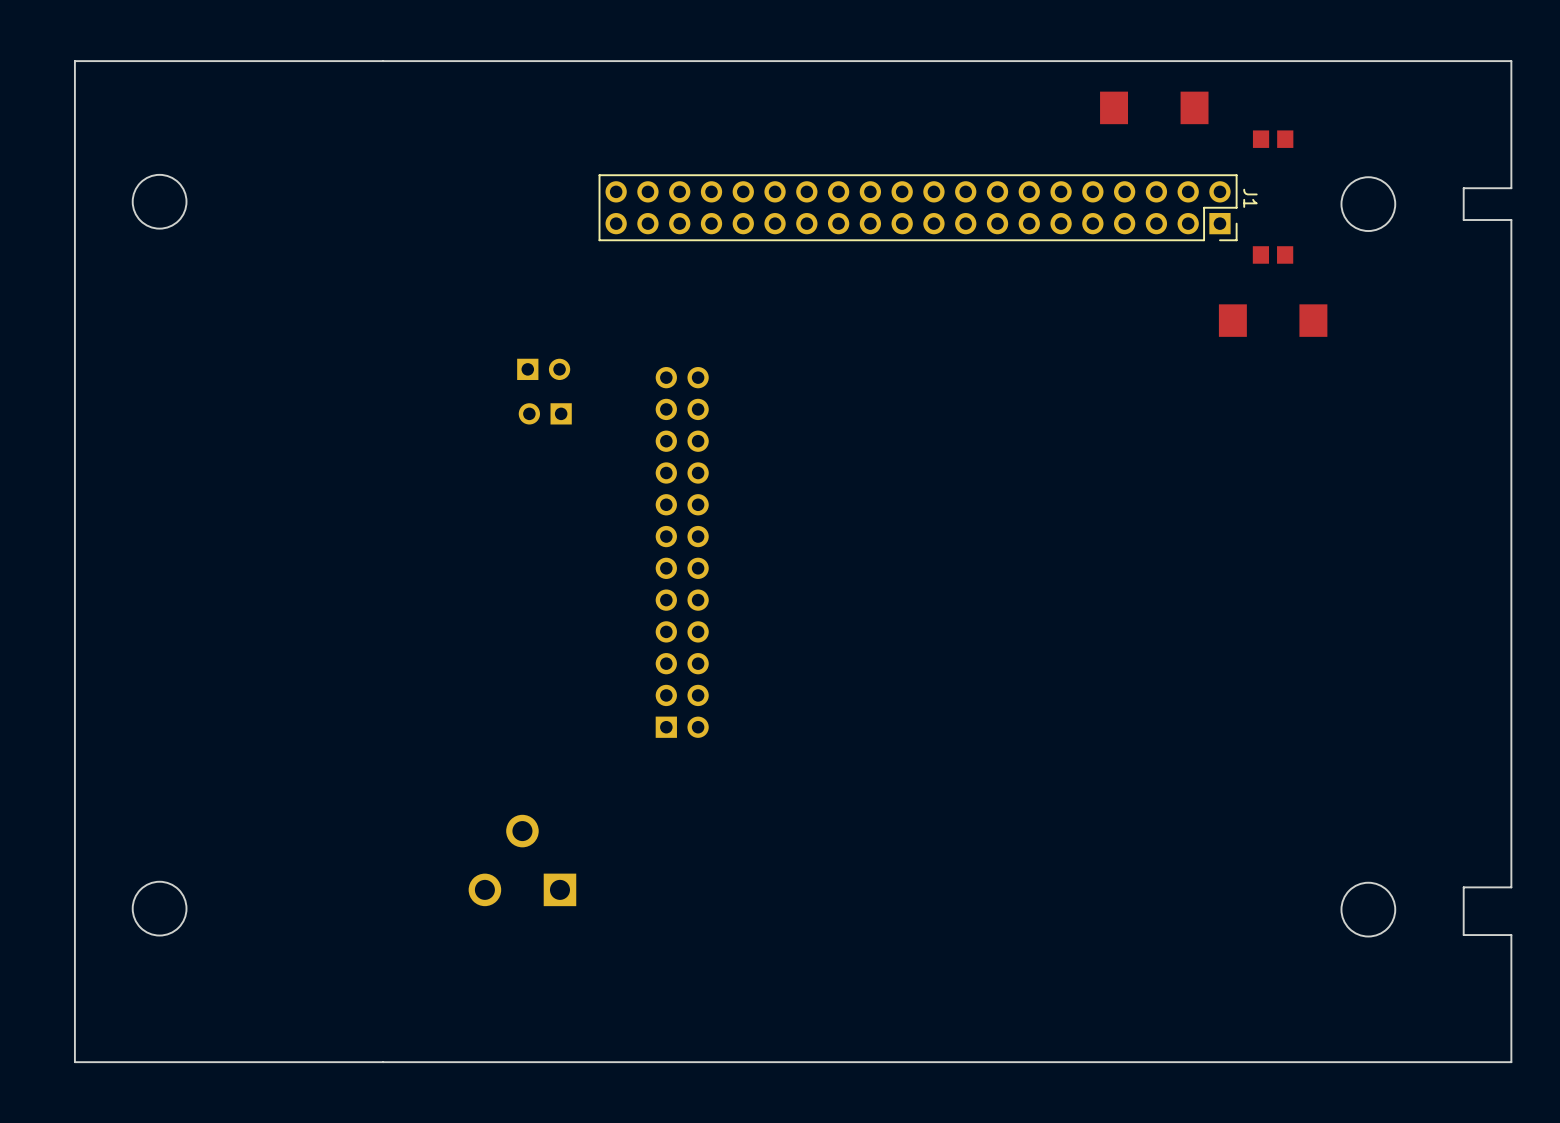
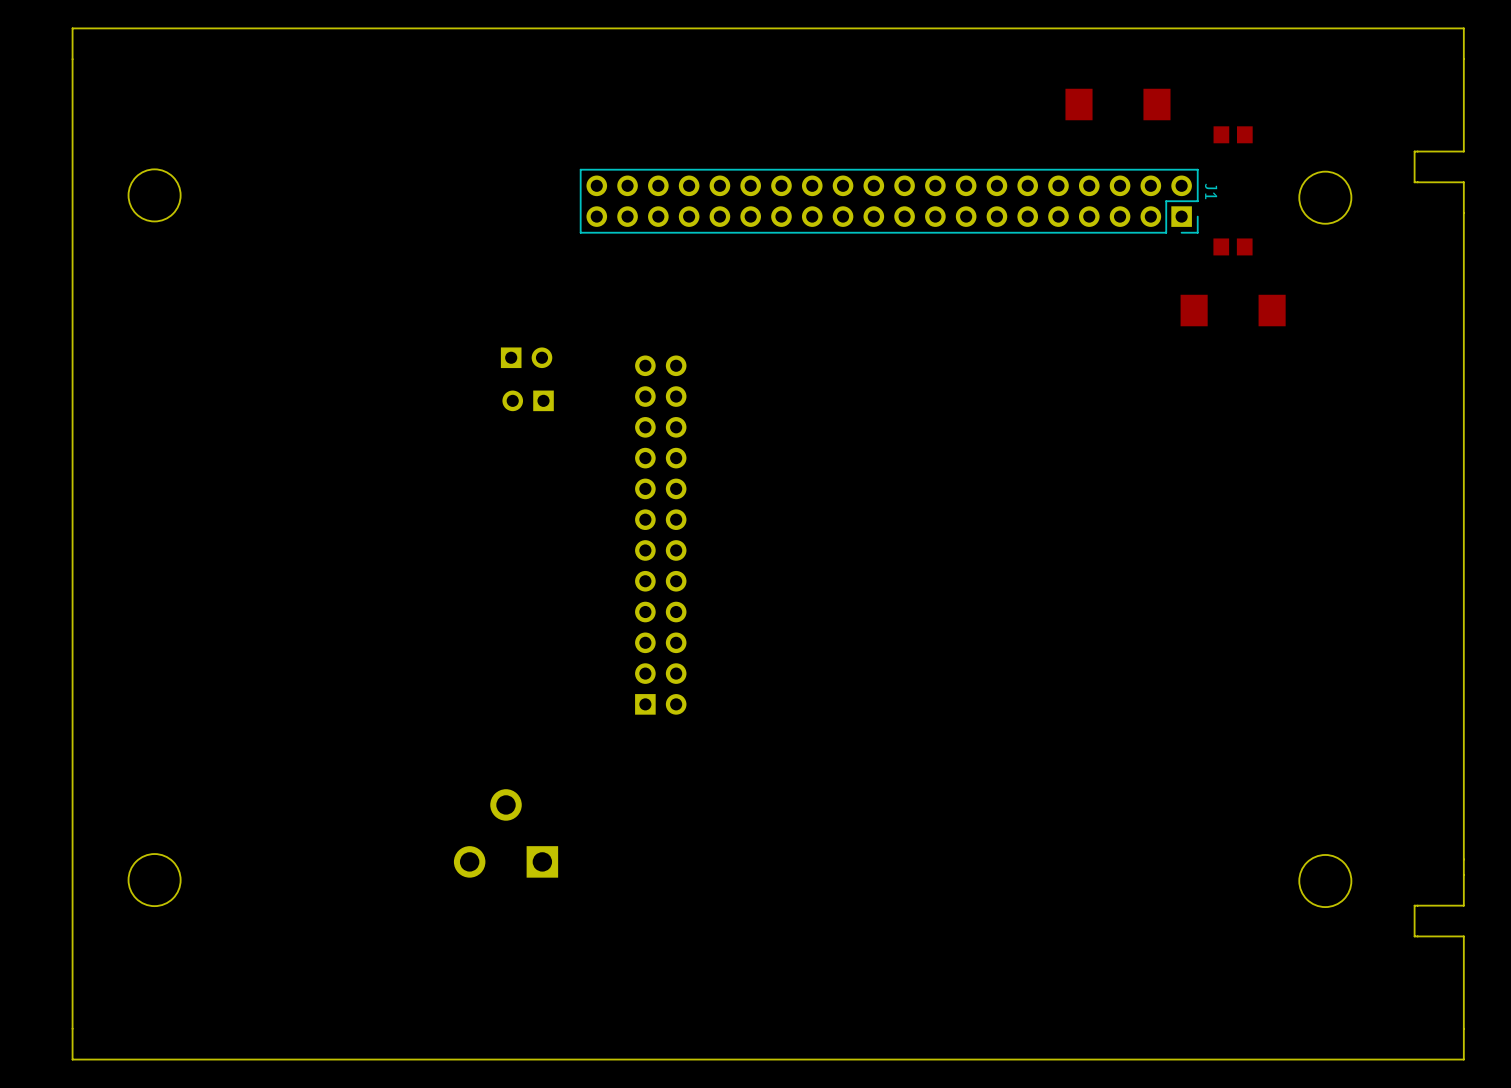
board edge: (1511, 61) (74, 61) -> (1463, 59) (1463, 28) (72, 28) (72, 59)
board edge: (1511, 156) (1511, 188) -> (1463, 151) (1414, 151) (1414, 182) (1417, 182)
board edge: (1463, 188) (1463, 220) (1511, 220) -> (1463, 182) (1463, 213)
board edge: (1511, 887) (1463, 887) (1463, 935) -> (1463, 859) (1463, 905)
board edge: (1511, 935) (1511, 966) -> (1417, 905) (1414, 905) (1414, 936) (1463, 936)
board edge: (1511, 1062) (74, 1062) -> (1463, 1028) (1463, 1059) (72, 1059) (72, 1028)

